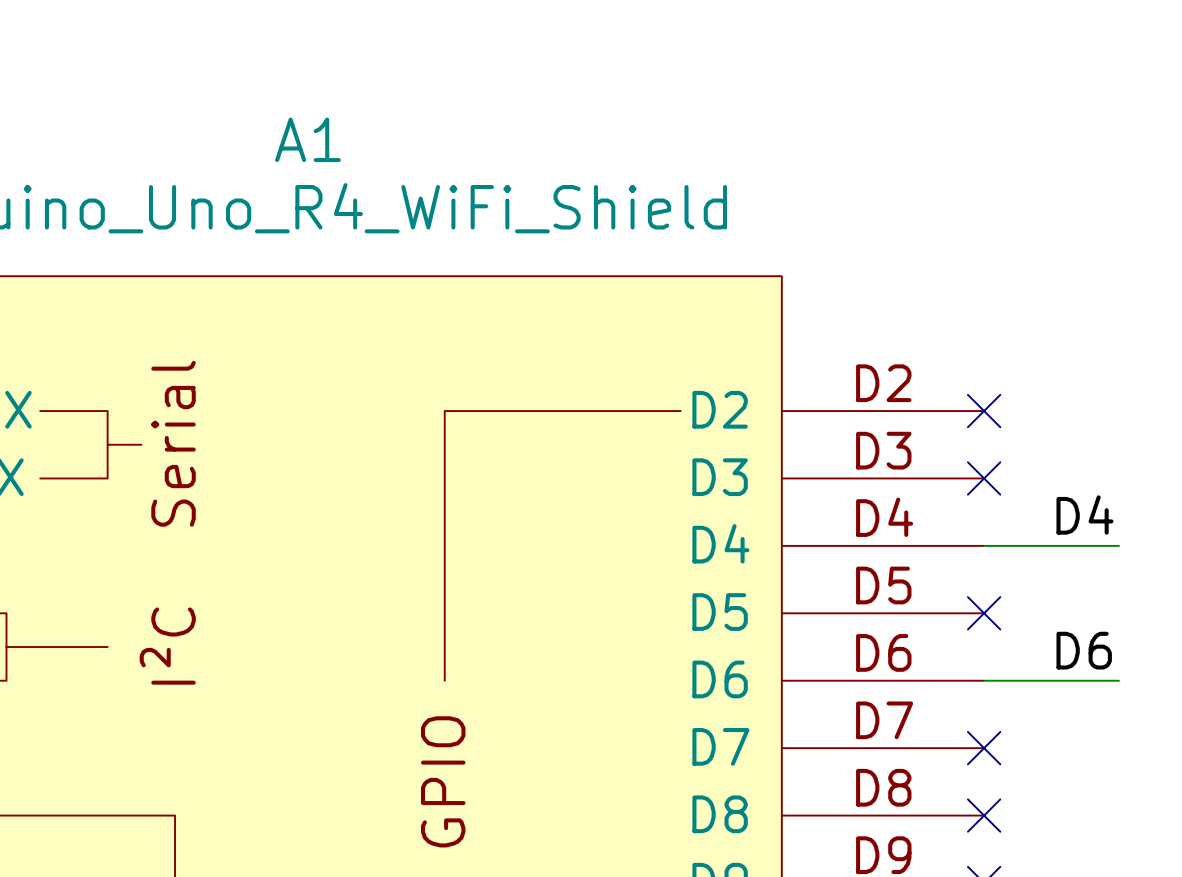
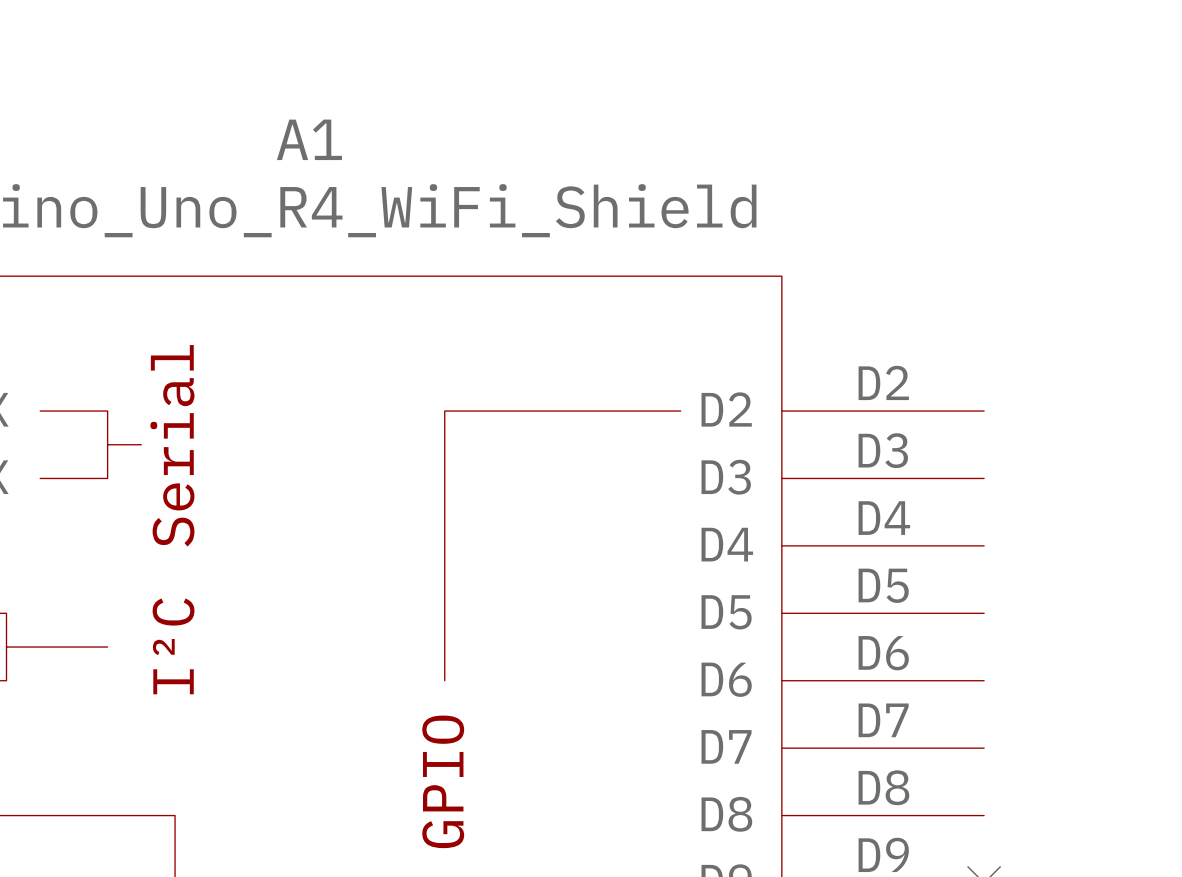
no-connect mark: (984, 411) -> none
no-connect mark: (984, 478) -> none
label: D4 (1084, 514) -> none
wire: (984, 545) (1118, 545) -> none
no-connect mark: (984, 613) -> none
label: D6 (1084, 650) -> none
wire: (984, 680) (1118, 680) -> none
no-connect mark: (984, 748) -> none
no-connect mark: (984, 815) -> none

